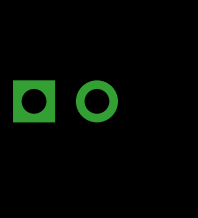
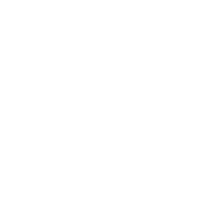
part: (65, 101) -> none

